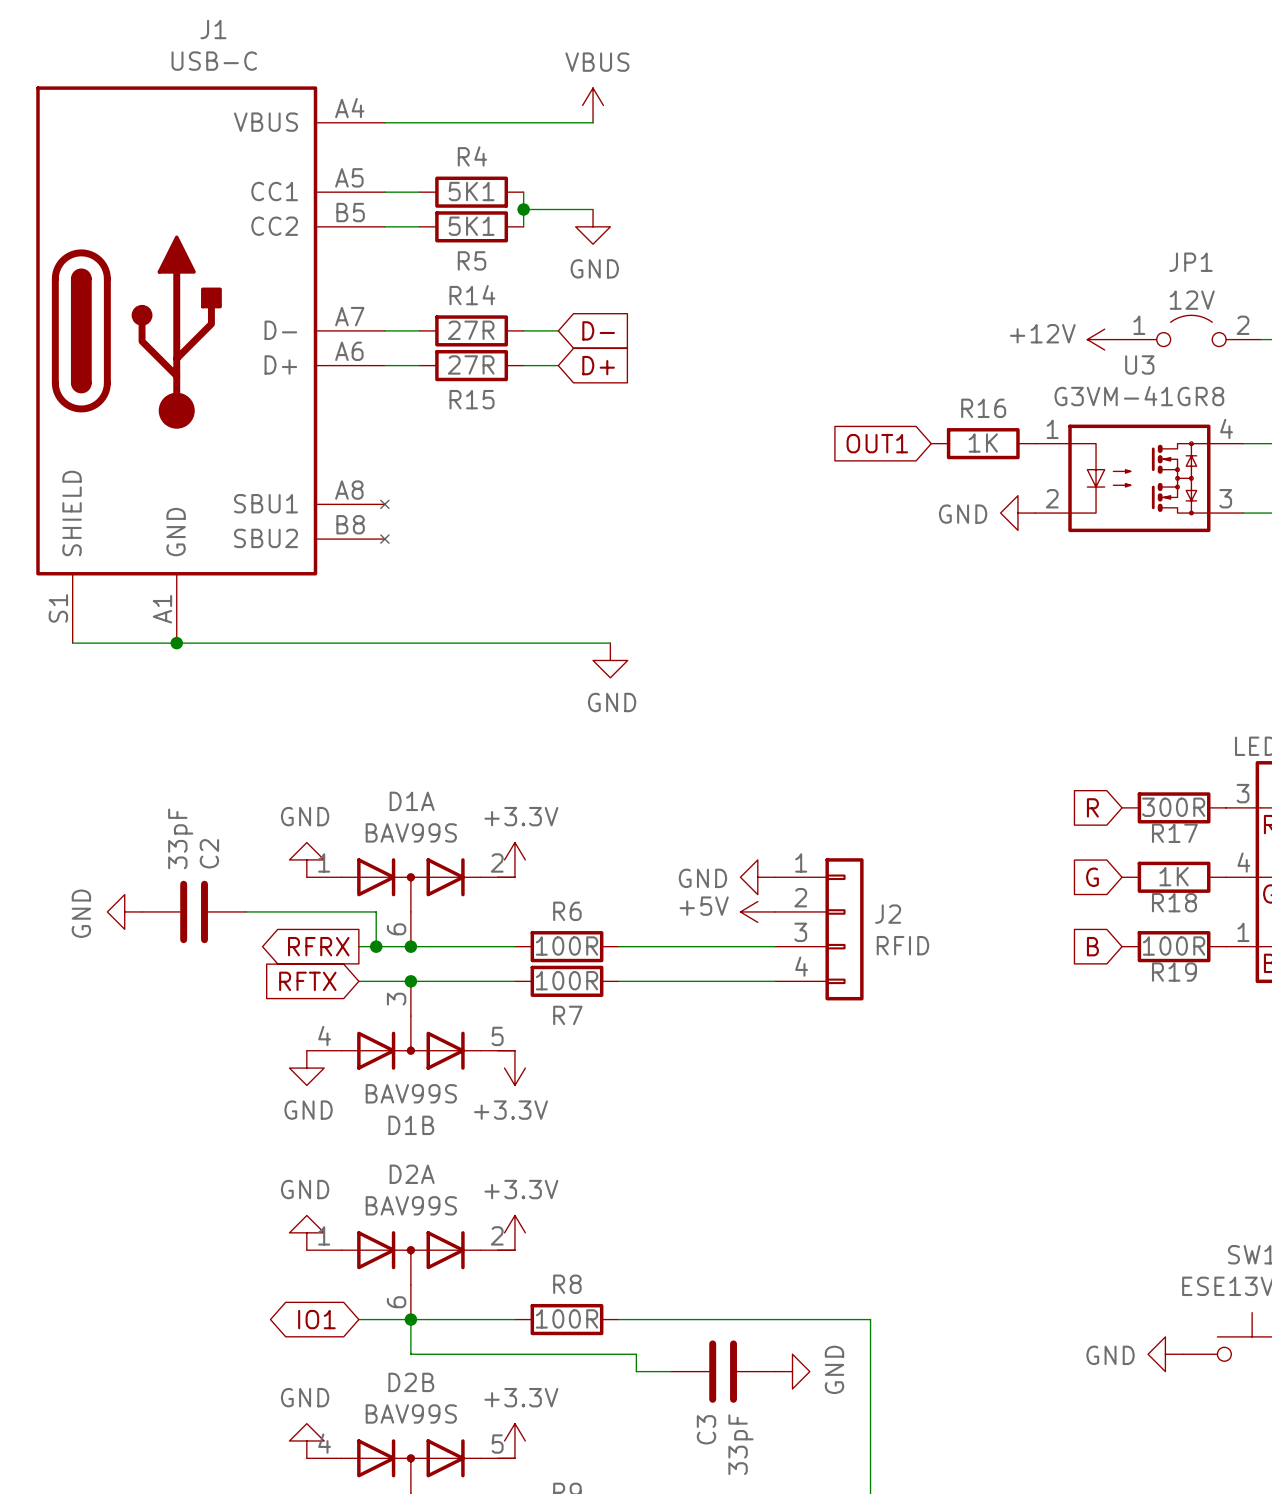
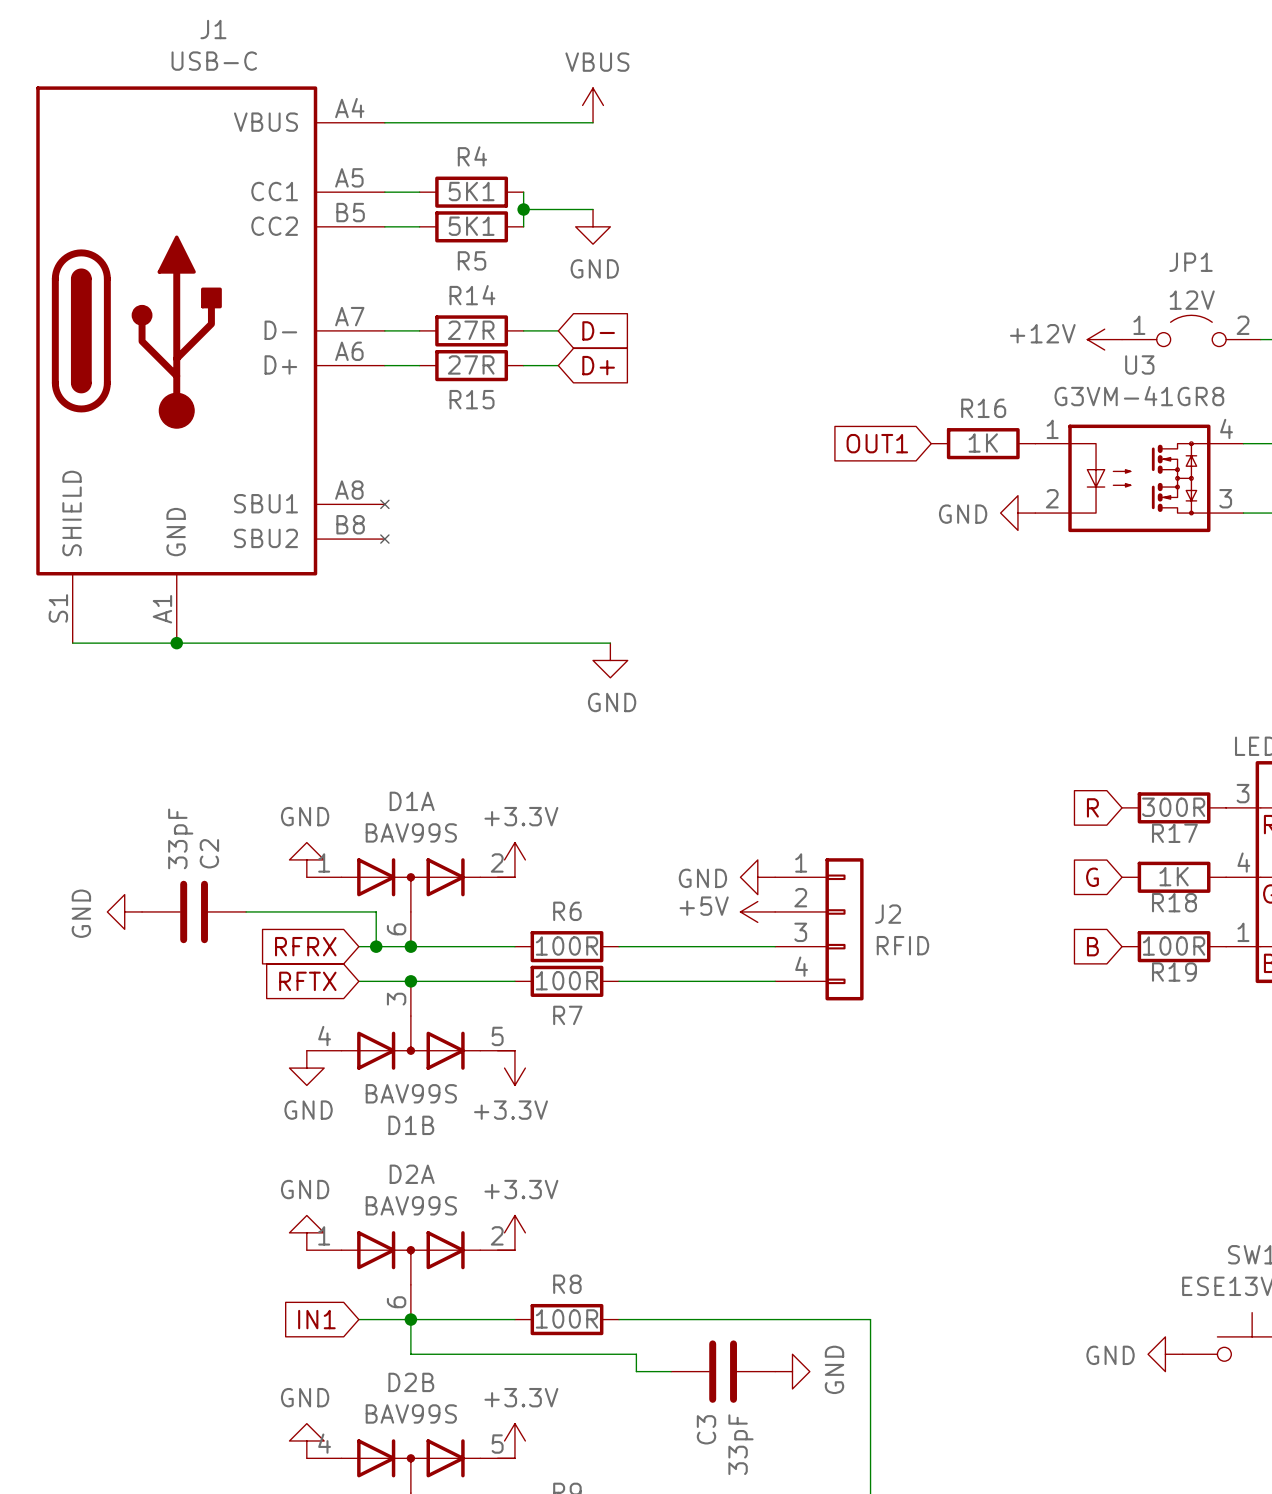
global label shape: output (318, 946) -> input (305, 946)
global label shape: bidirectional (316, 1319) -> input (316, 1319)
global label: IO1 (316, 1319) -> IN1 (316, 1319)

